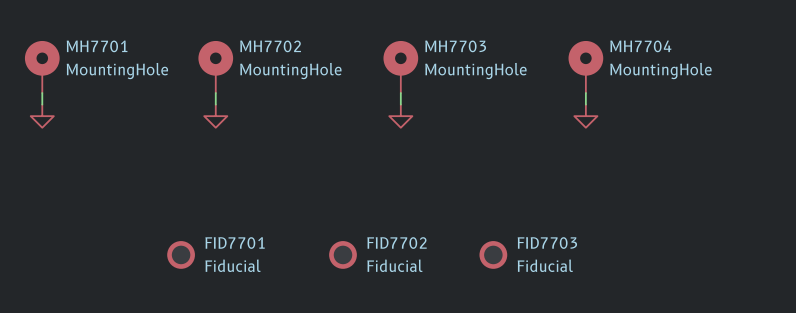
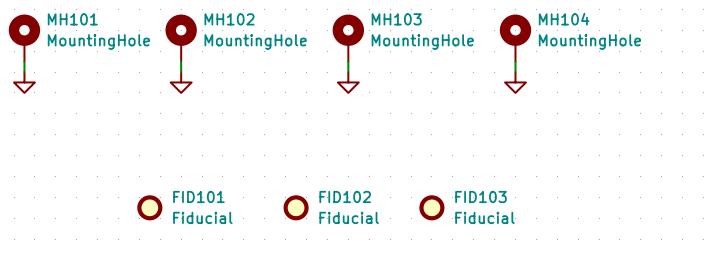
MH7701 name: MH7701 (97, 46) -> MH101 (72, 19)
MH7702 name: MH7702 (270, 46) -> MH102 (229, 19)
MH7703 name: MH7703 (455, 46) -> MH103 (396, 19)
MH7704 name: MH7704 (640, 46) -> MH104 (564, 19)
FID7701 name: FID7701 (235, 243) -> FID101 (198, 196)
FID7702 name: FID7702 (397, 243) -> FID102 (345, 196)
FID7703 name: FID7703 (547, 243) -> FID103 (480, 196)

